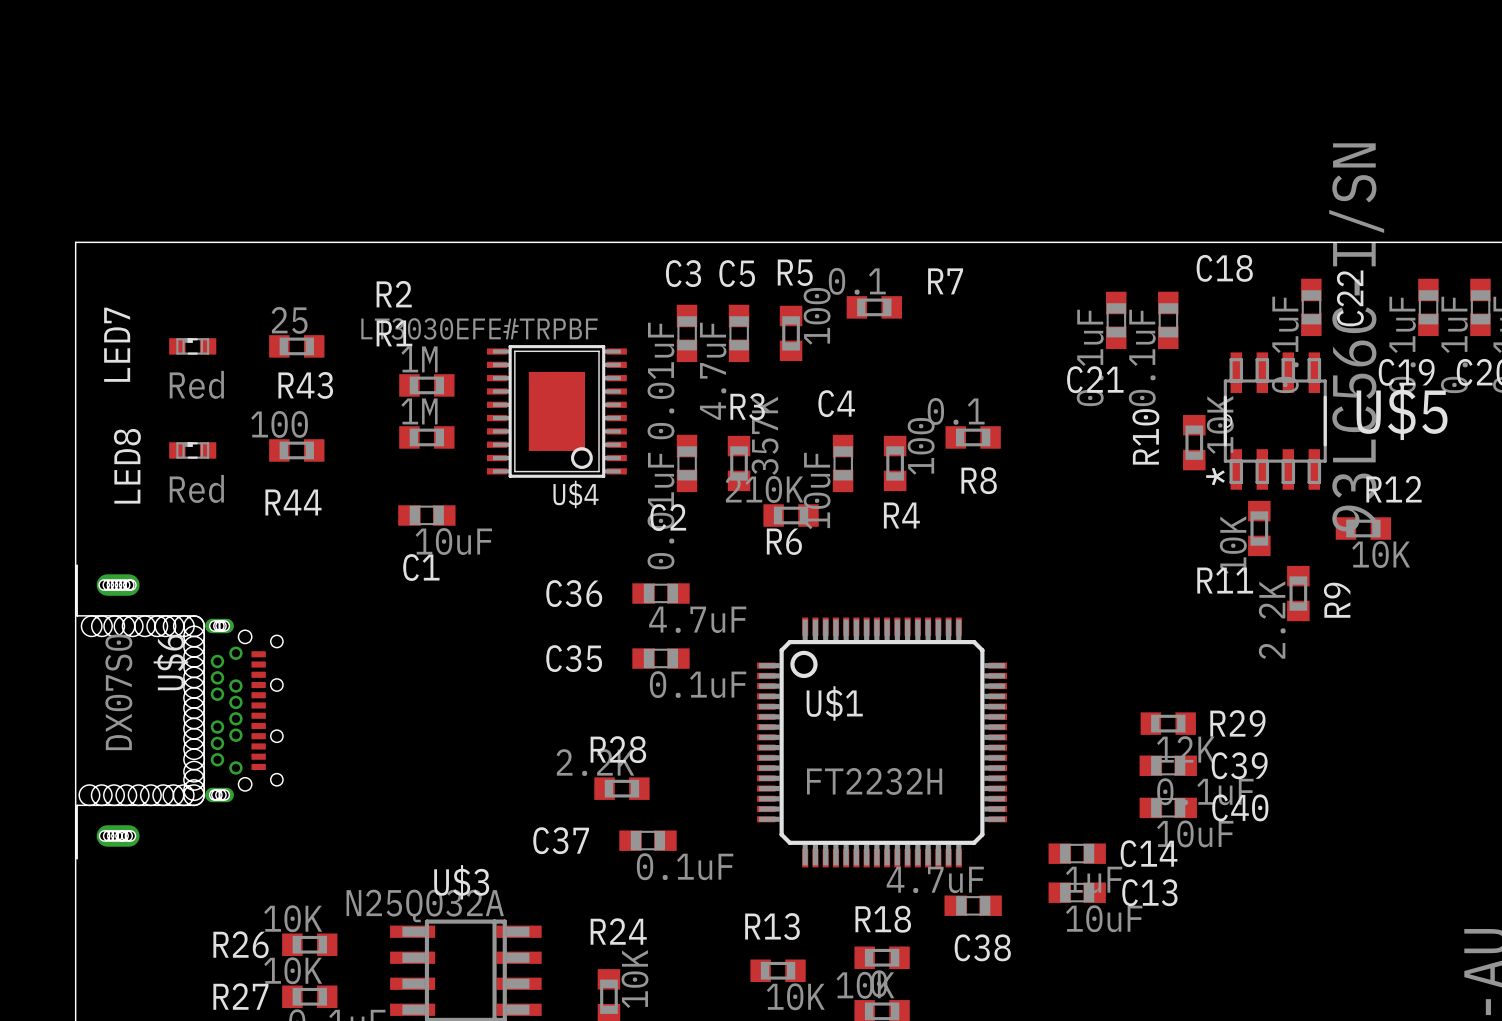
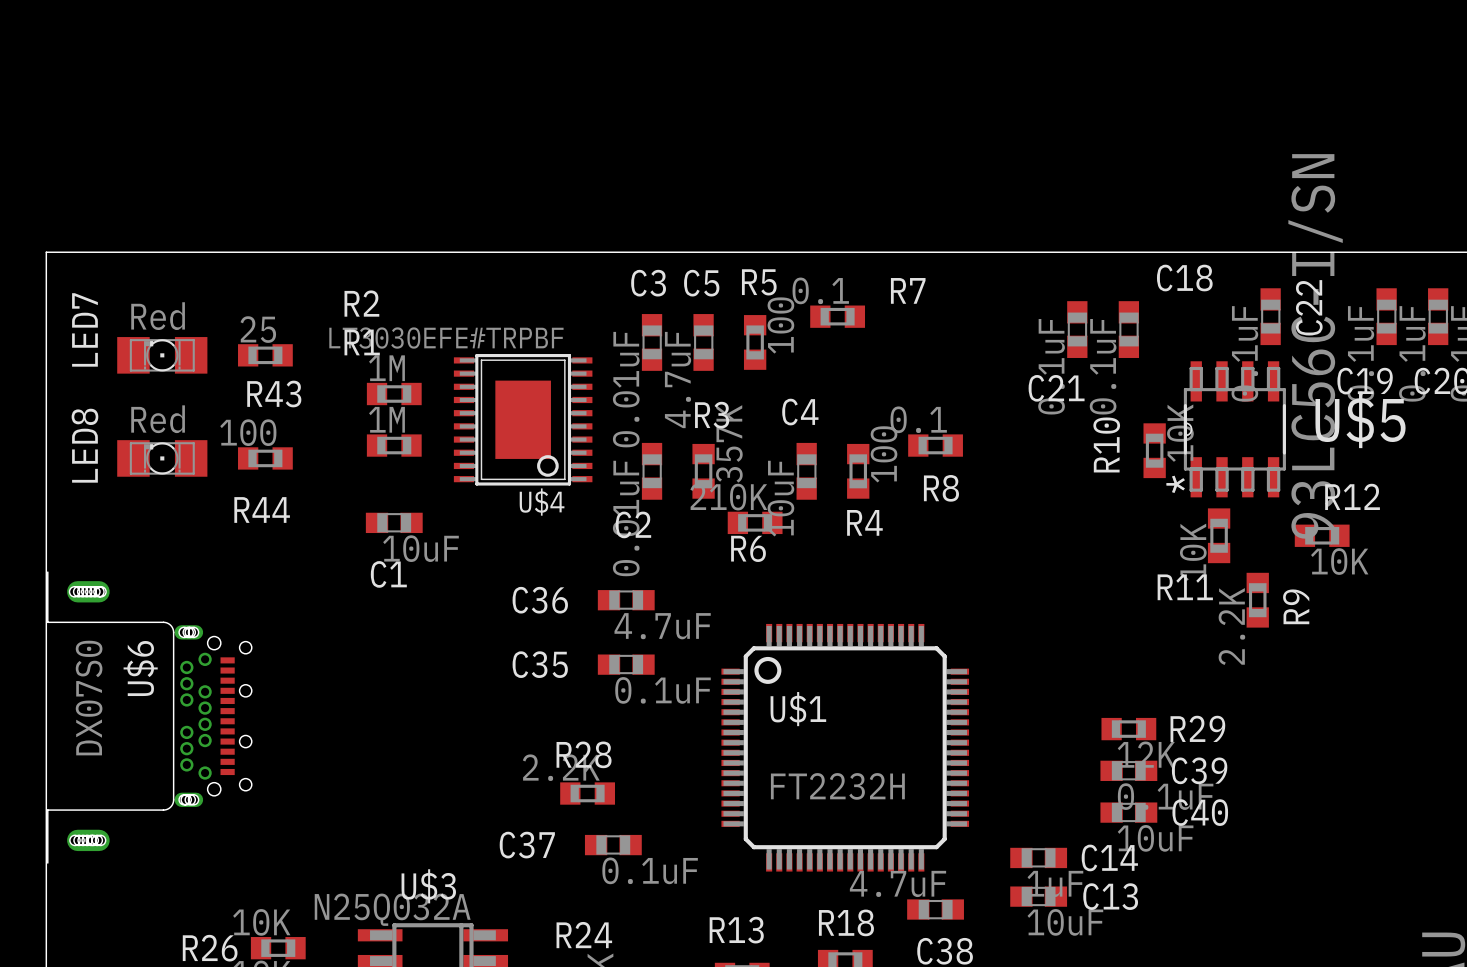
LED7 footprint: [169, 338, 217, 355] -> [117, 337, 208, 374]
LED7 value position: Red (196, 384) -> Red (158, 316)
LED8 footprint: [169, 442, 217, 459] -> [117, 440, 208, 477]
LED8 value position: Red (196, 488) -> Red (158, 419)
U$6 footprint: [76, 564, 284, 860] -> [47, 571, 252, 864]

